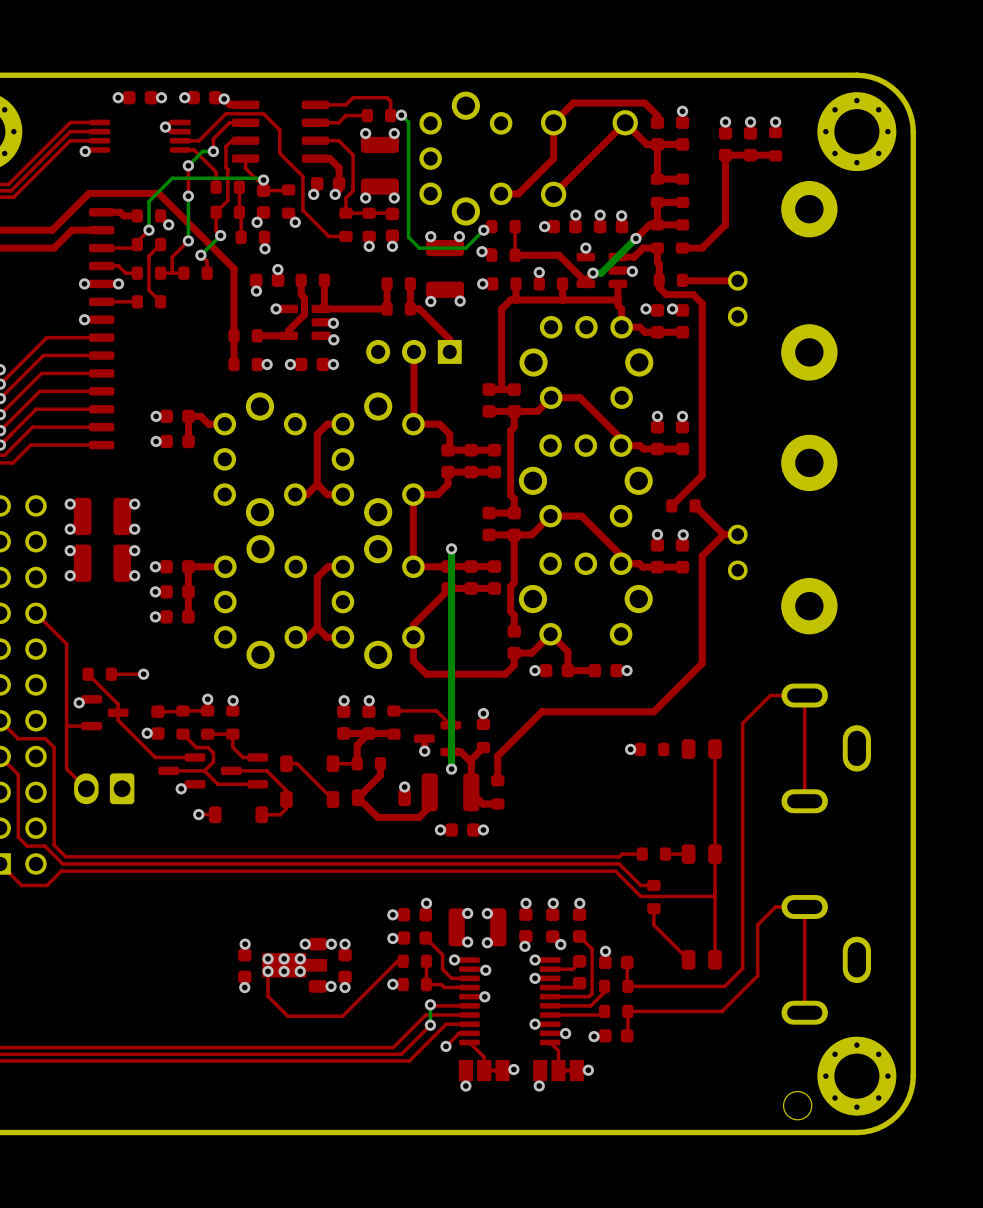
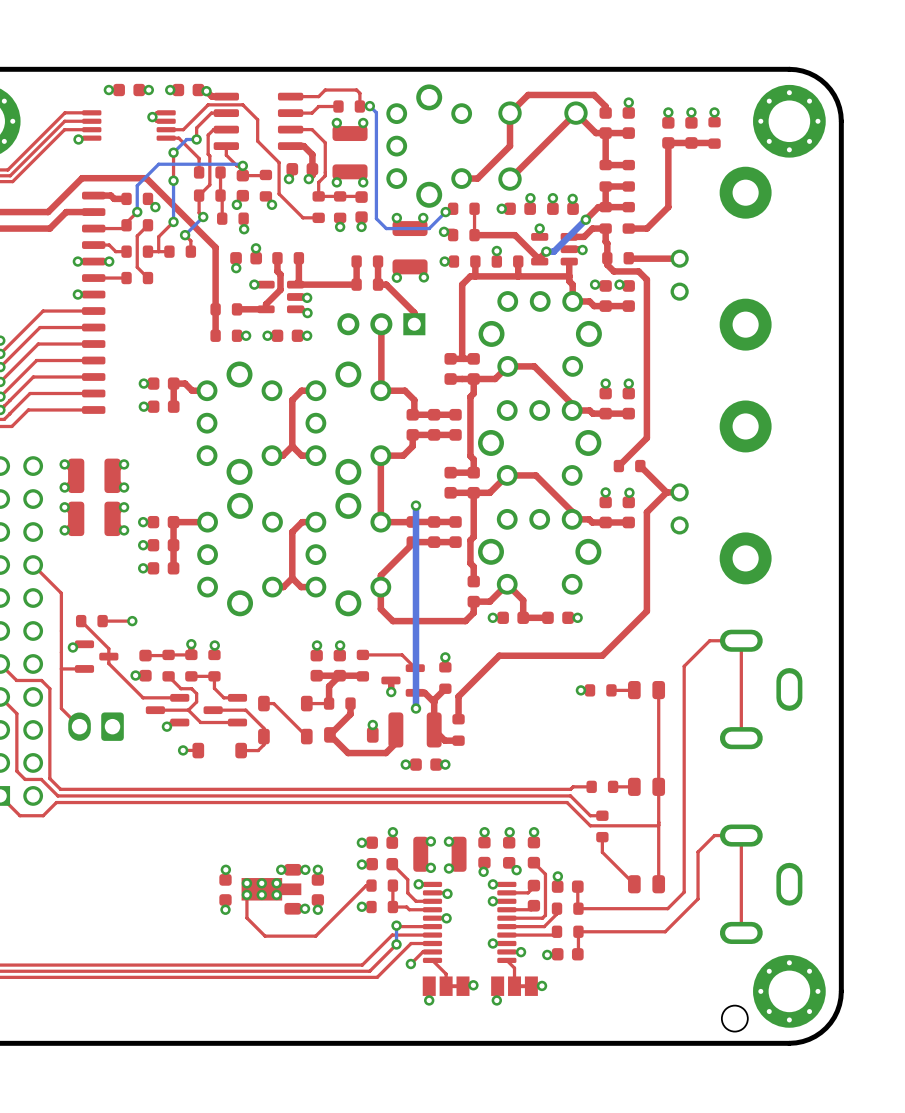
top track: none -> (634, 690) (611, 690)

